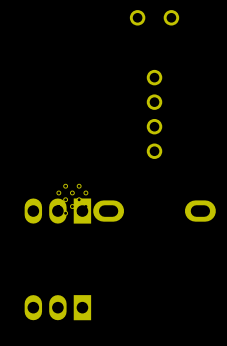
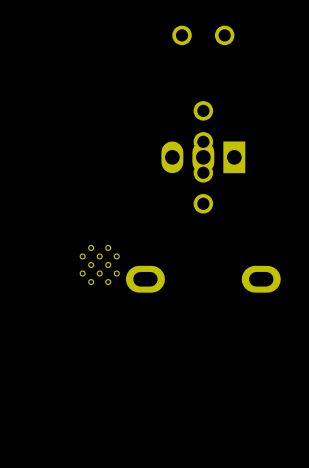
part: none -> (203, 157)
part: (57, 211) -> none
part: (57, 307) -> none

